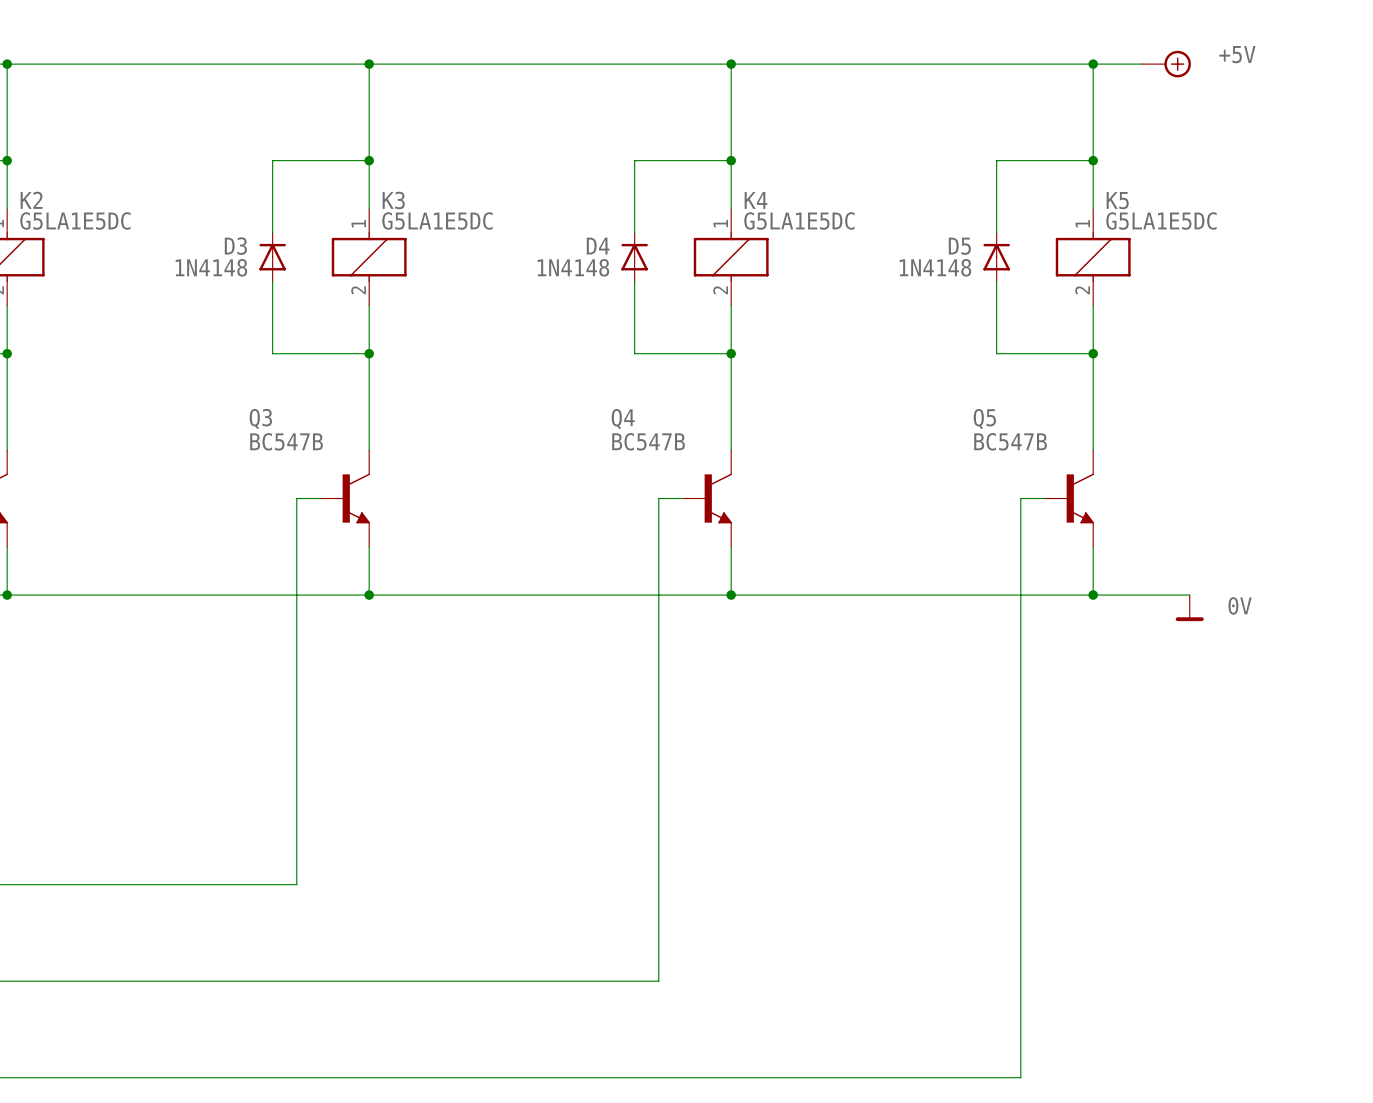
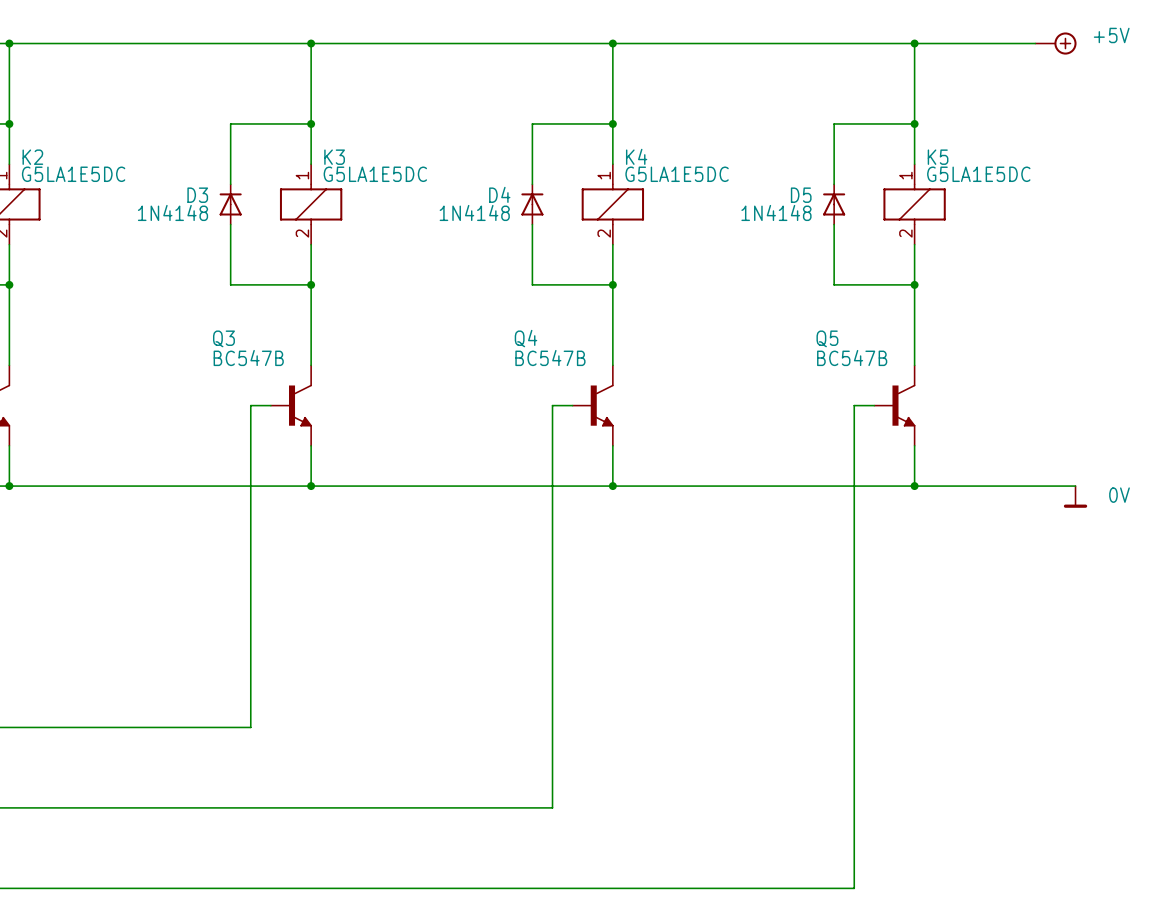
wire: none -> (954, 43) (1035, 43)
power symbol position: +5V (1166, 64) -> +5V (1055, 43)
wire: none -> (995, 486) (1075, 486)
power symbol position: 0V (1189, 608) -> 0V (1075, 496)

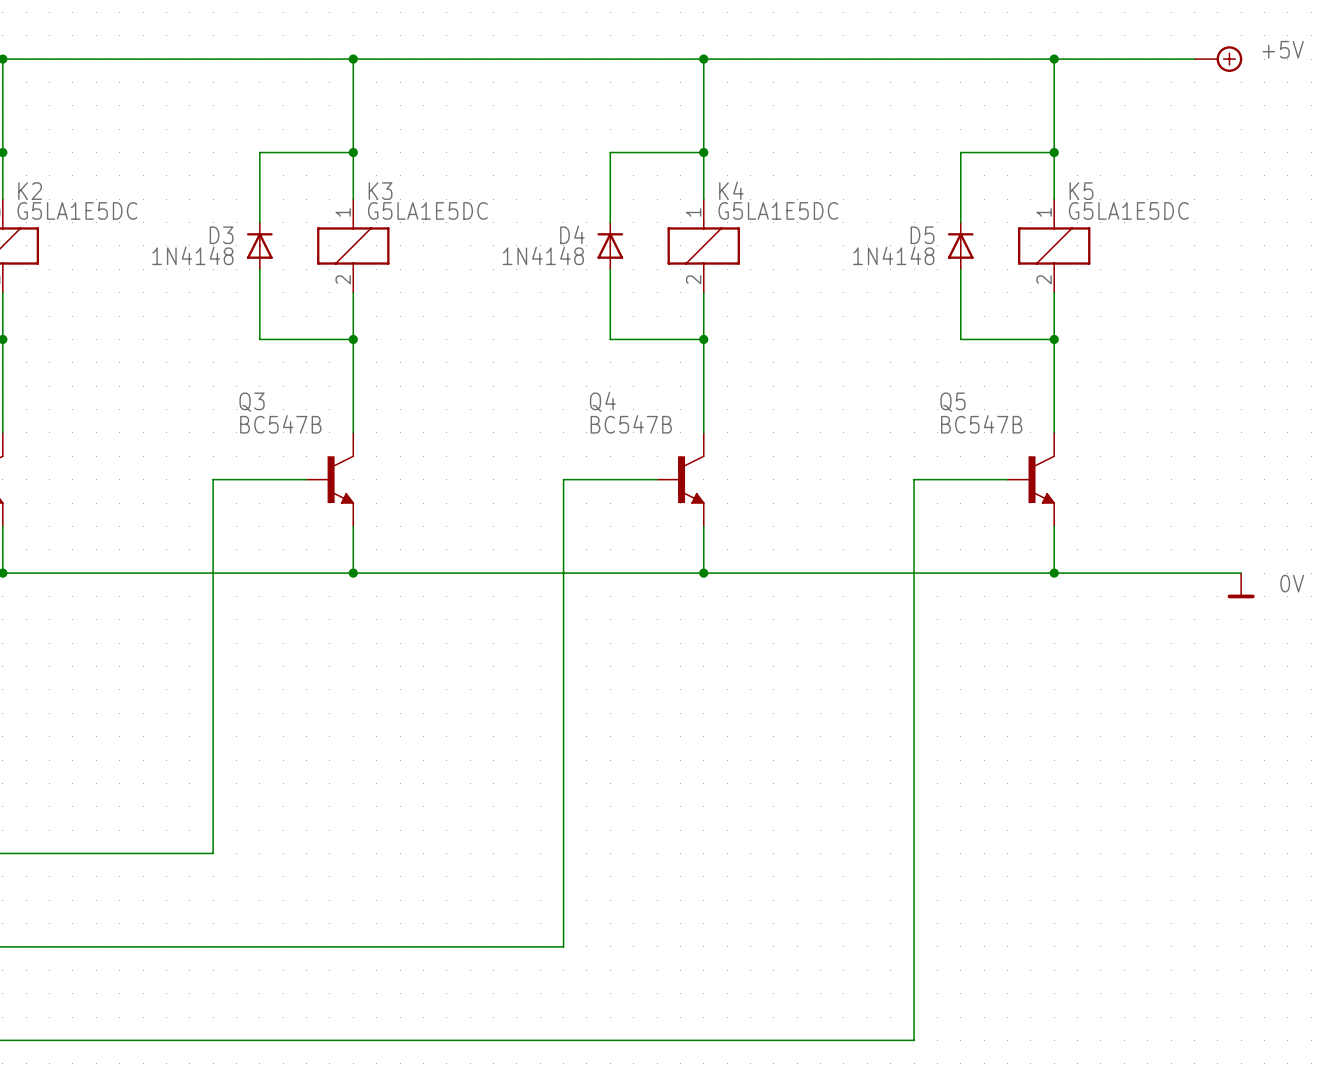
wire: (250, 405) (250, 727) (190, 727) -> (283, 479) (213, 479) (213, 853)
wire: (552, 405) (552, 807) (492, 807) -> (633, 479) (563, 479) (563, 946)
wire: (854, 405) (854, 888) (793, 888) -> (984, 479) (914, 479) (914, 1040)

